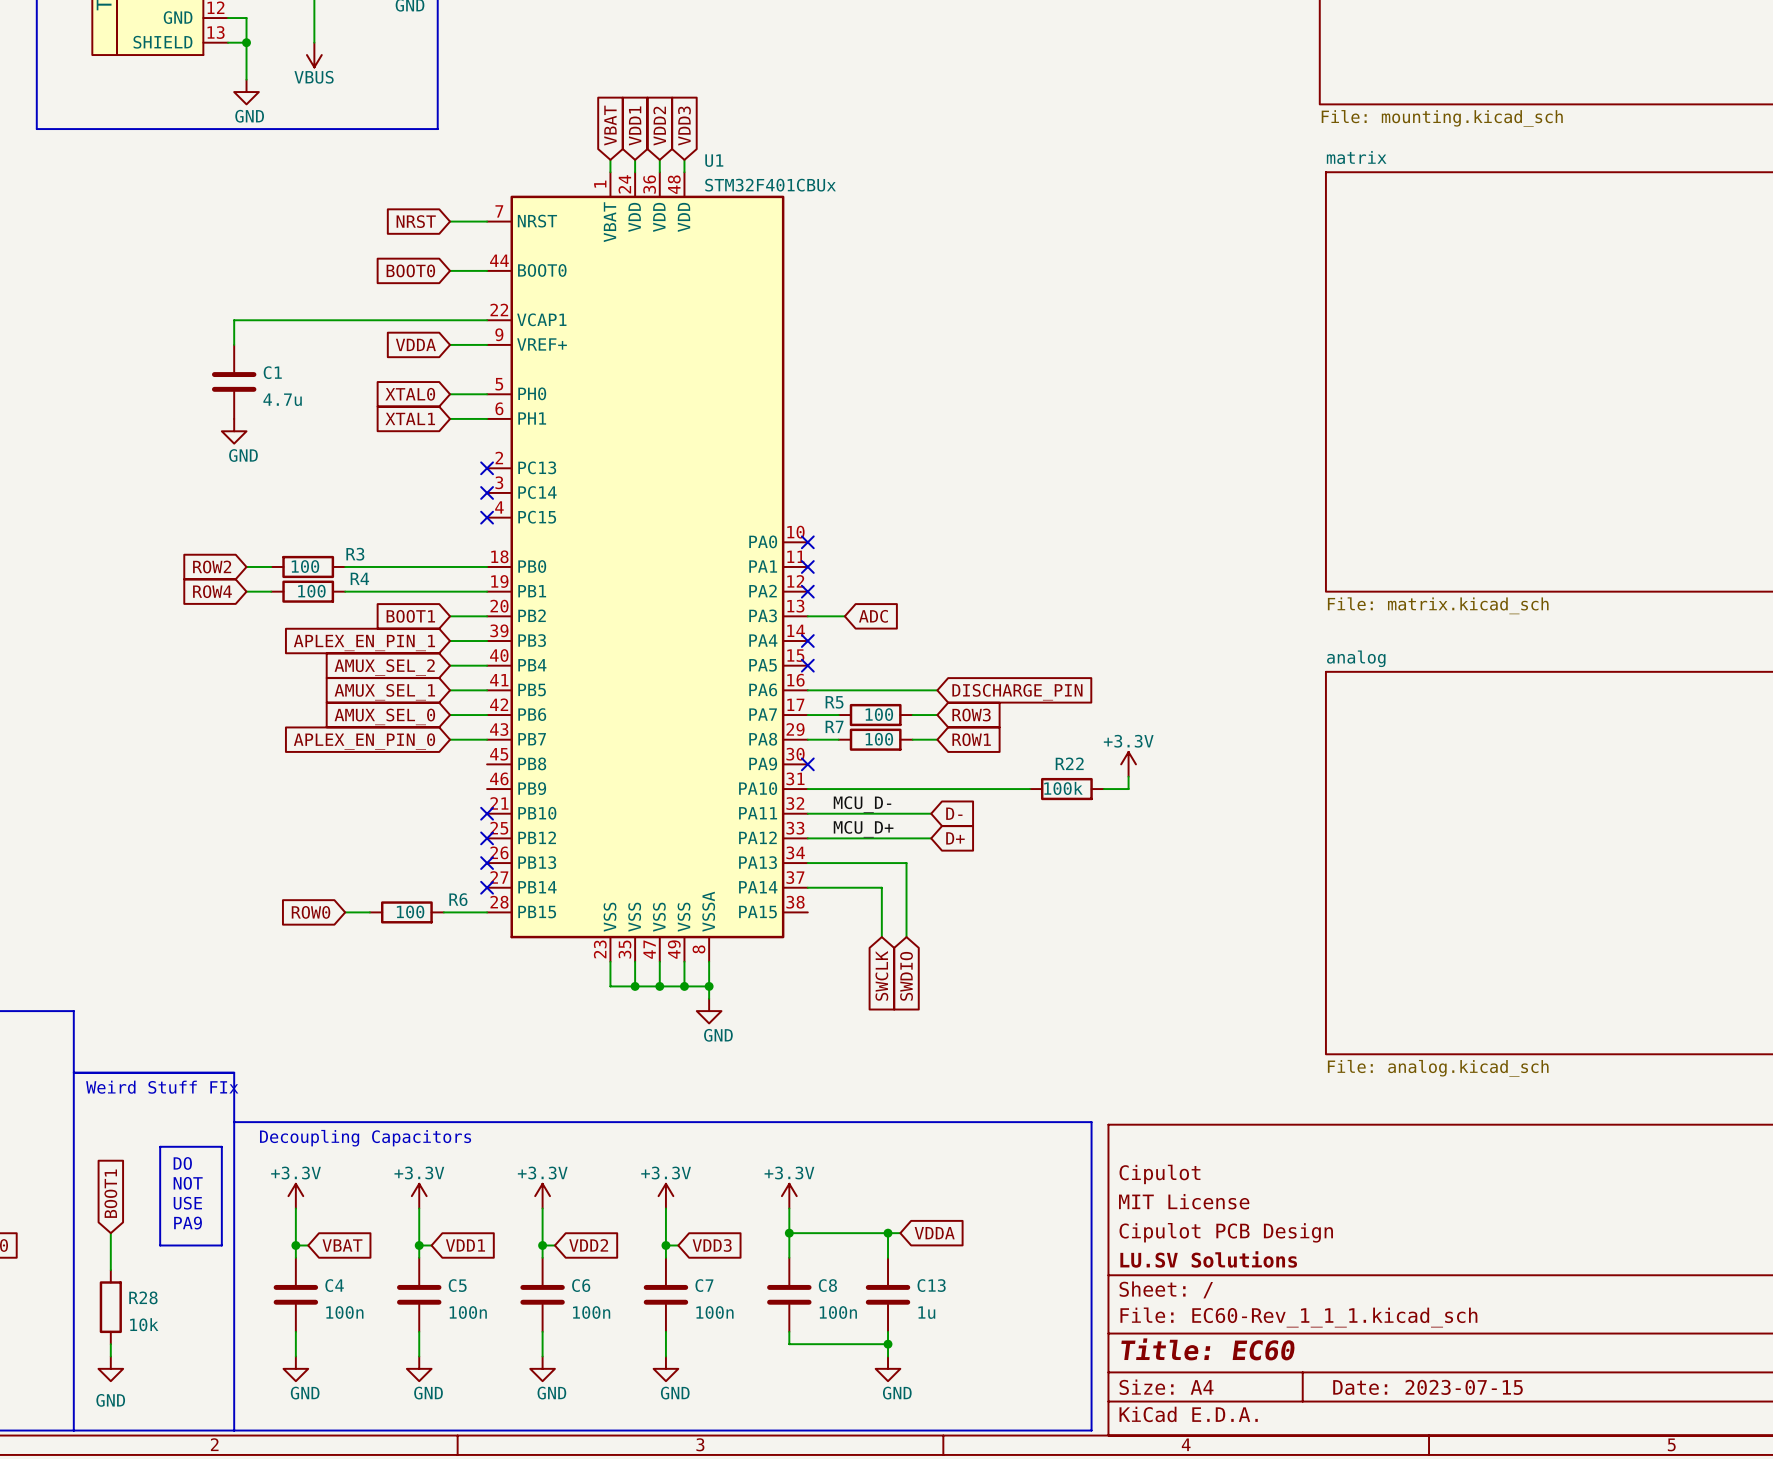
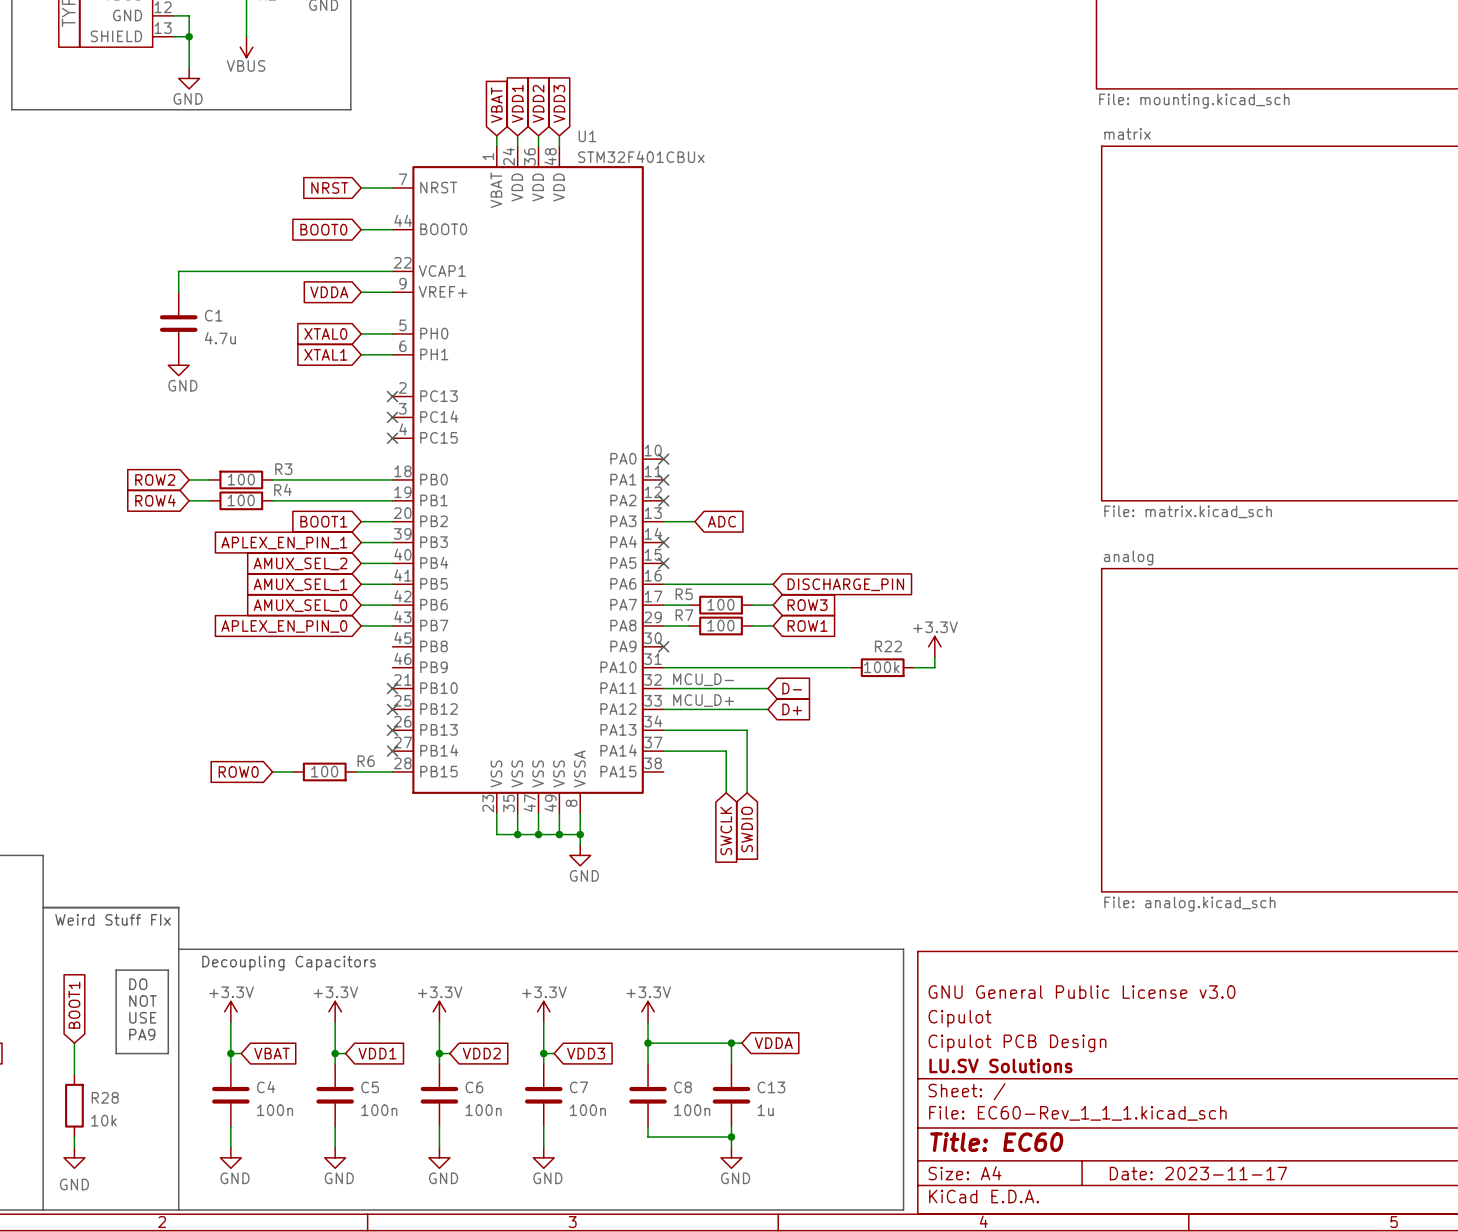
title block: Cipulot (1159, 1174) -> GNU General Public License v3.0 (1082, 992)
title block: MIT License (1184, 1201) -> Cipulot (959, 1018)
title block: Date: 2023-07-15 (1428, 1387) -> Date: 2023-11-17 (1198, 1173)

